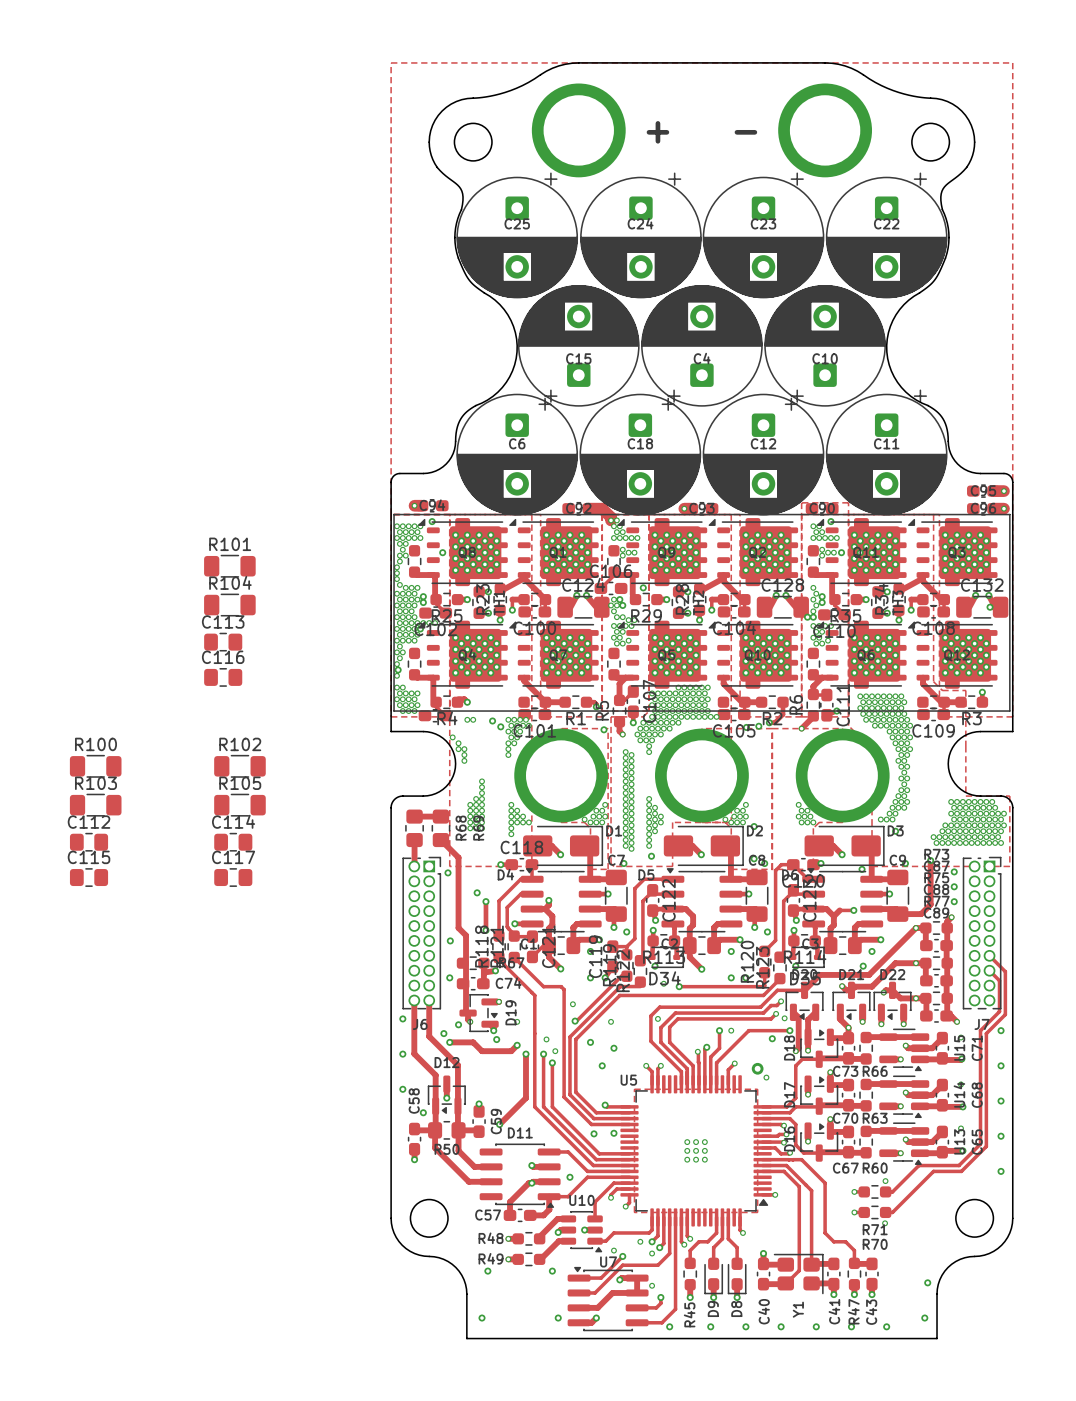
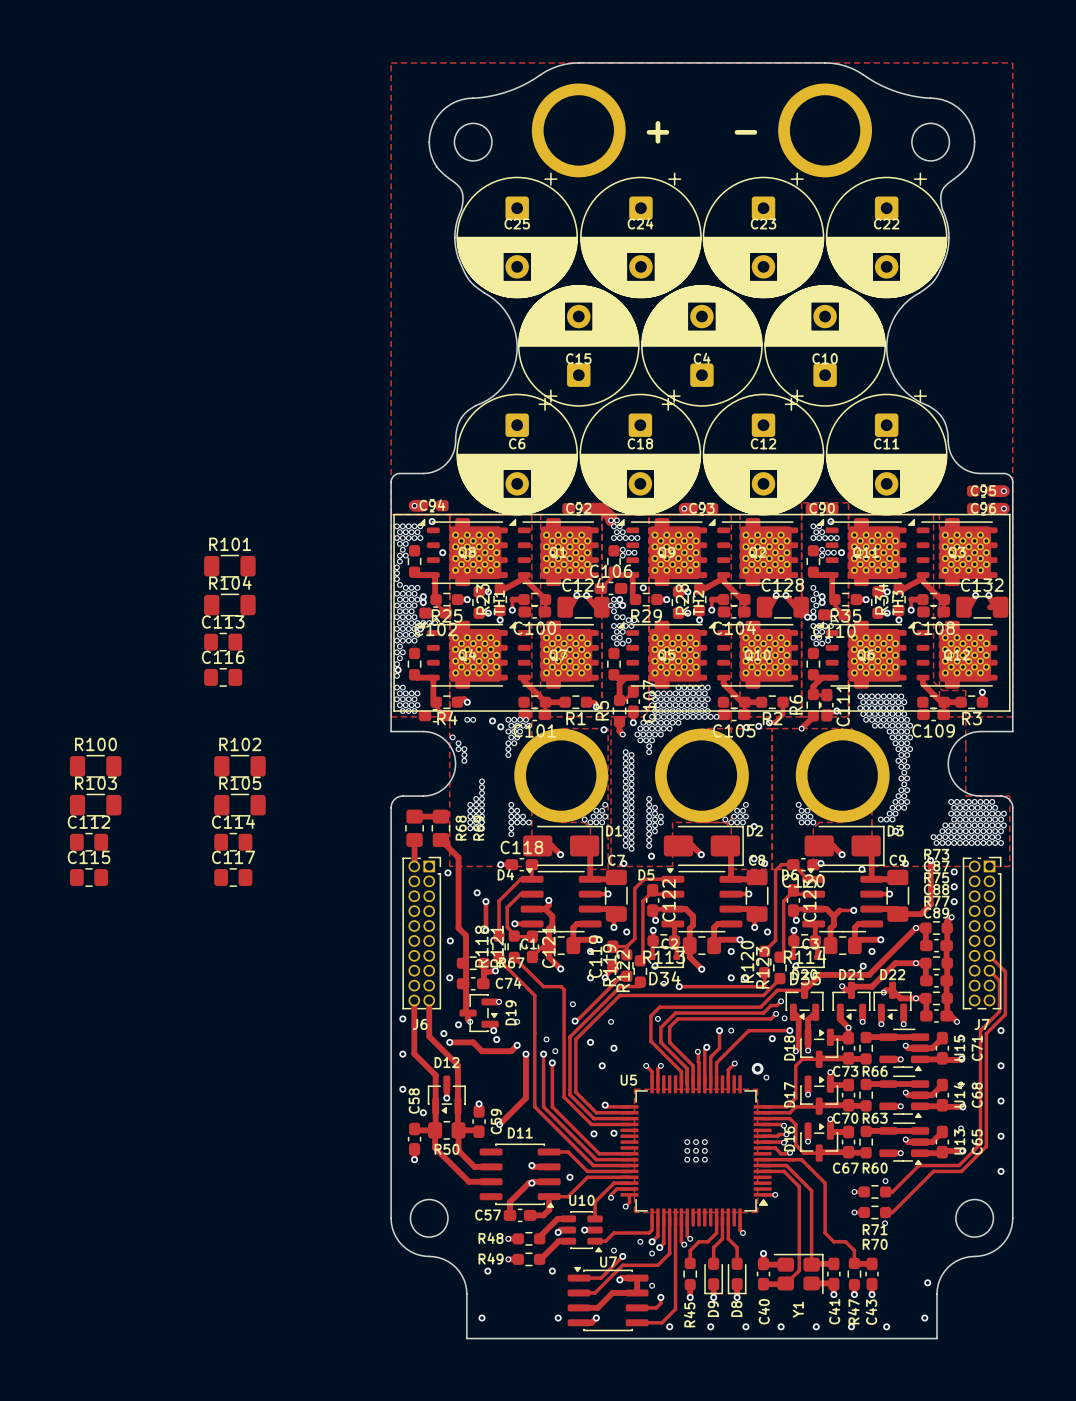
via: (990, 607) -> none

